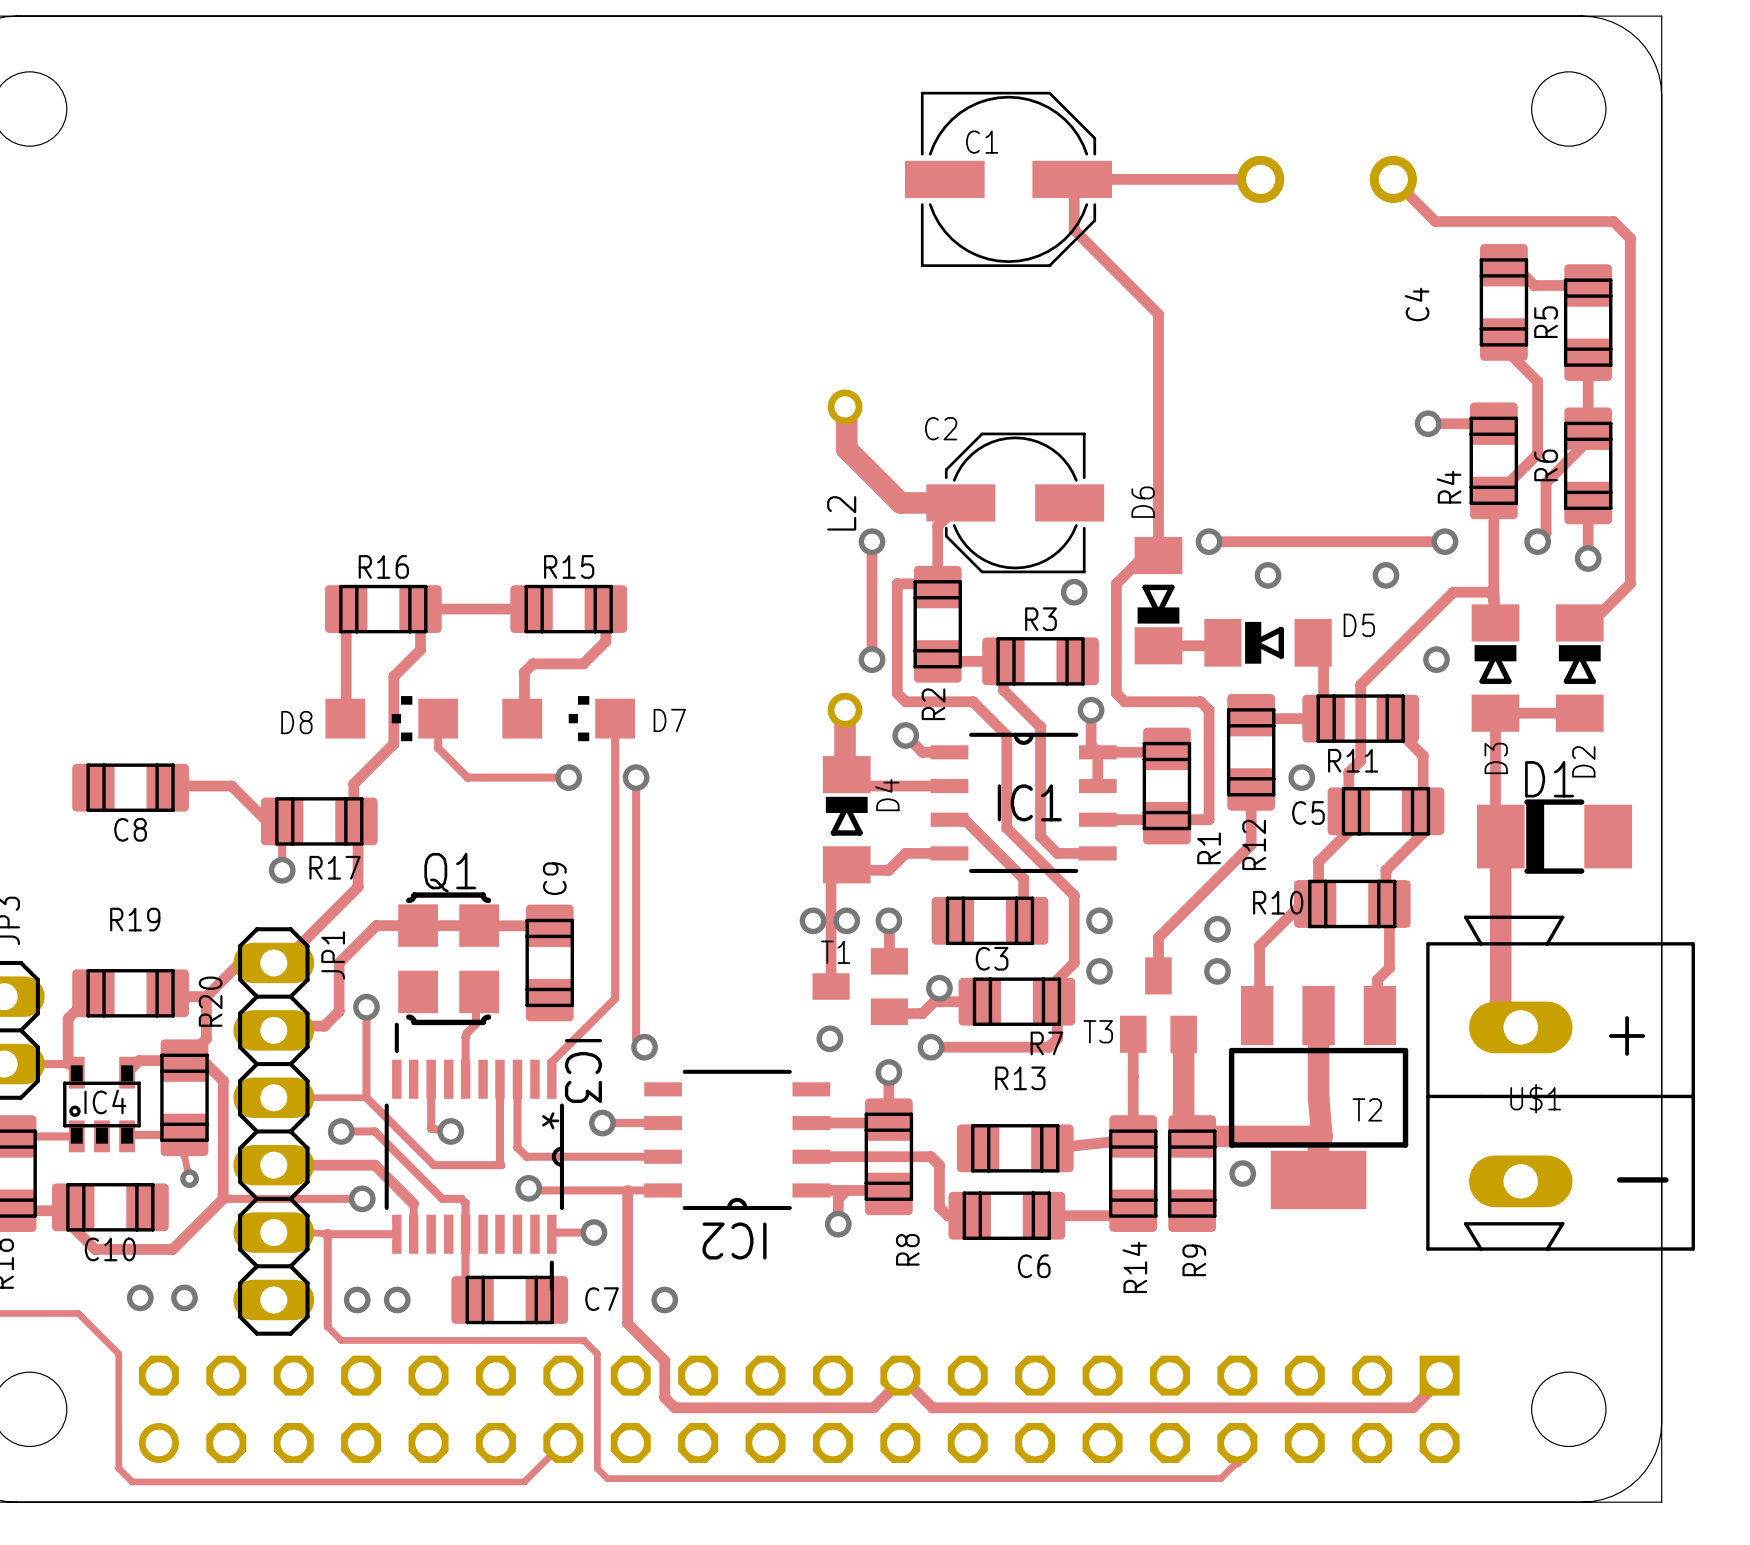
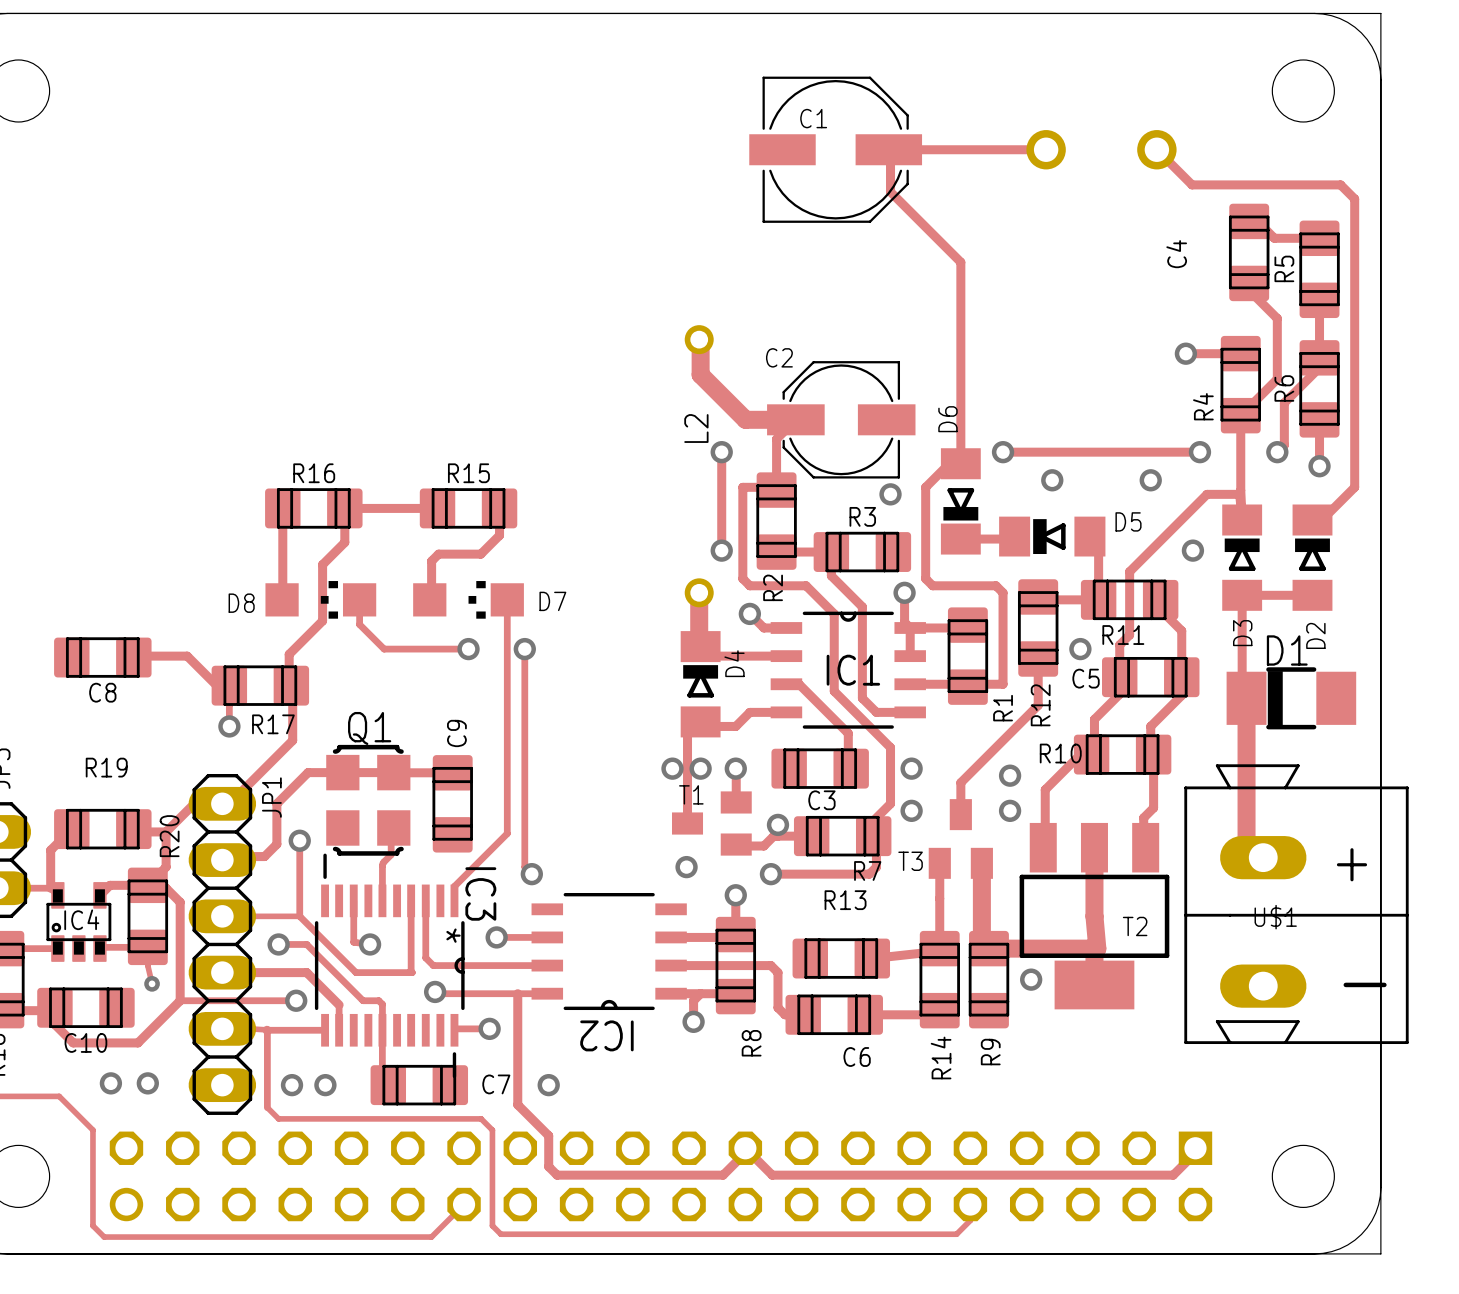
track: (1237, 1443) (1237, 1462) (1220, 1478) (1153, 1478) -> (970, 1204) (970, 1220) (956, 1234)

